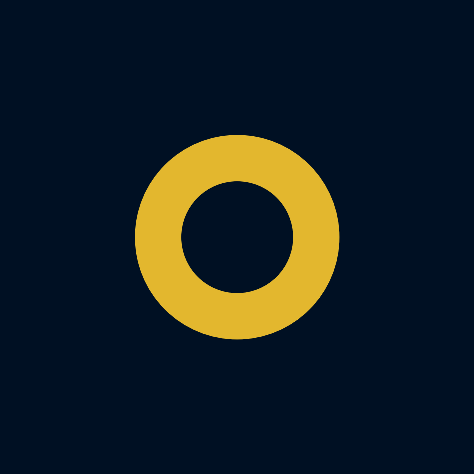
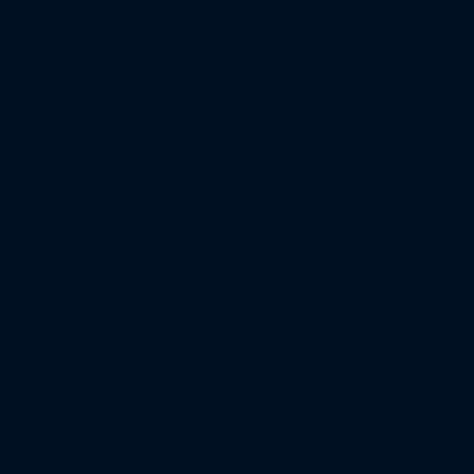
part: (237, 237) -> none

